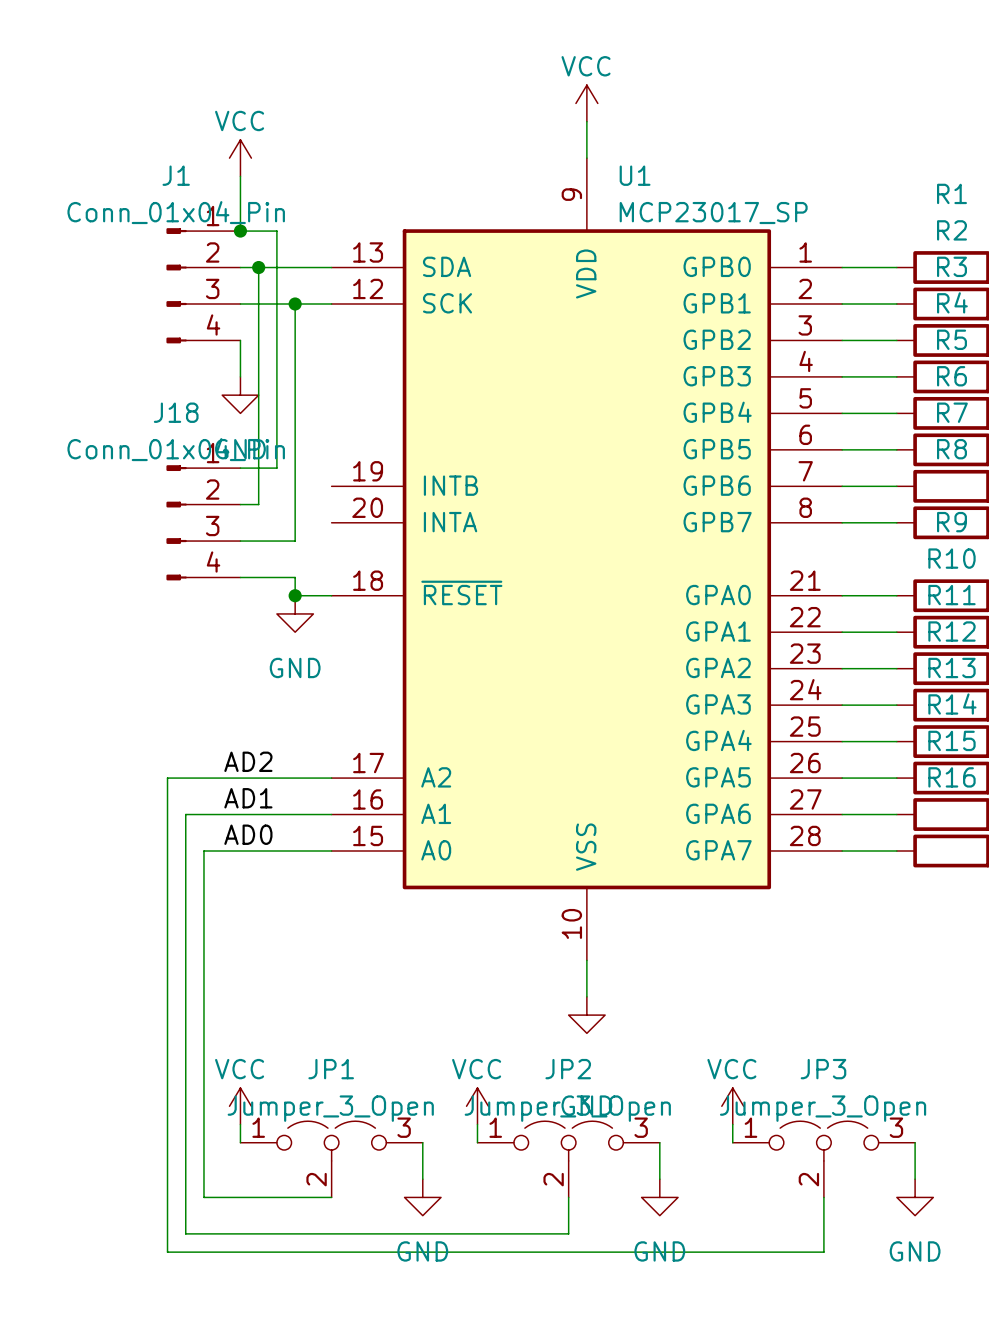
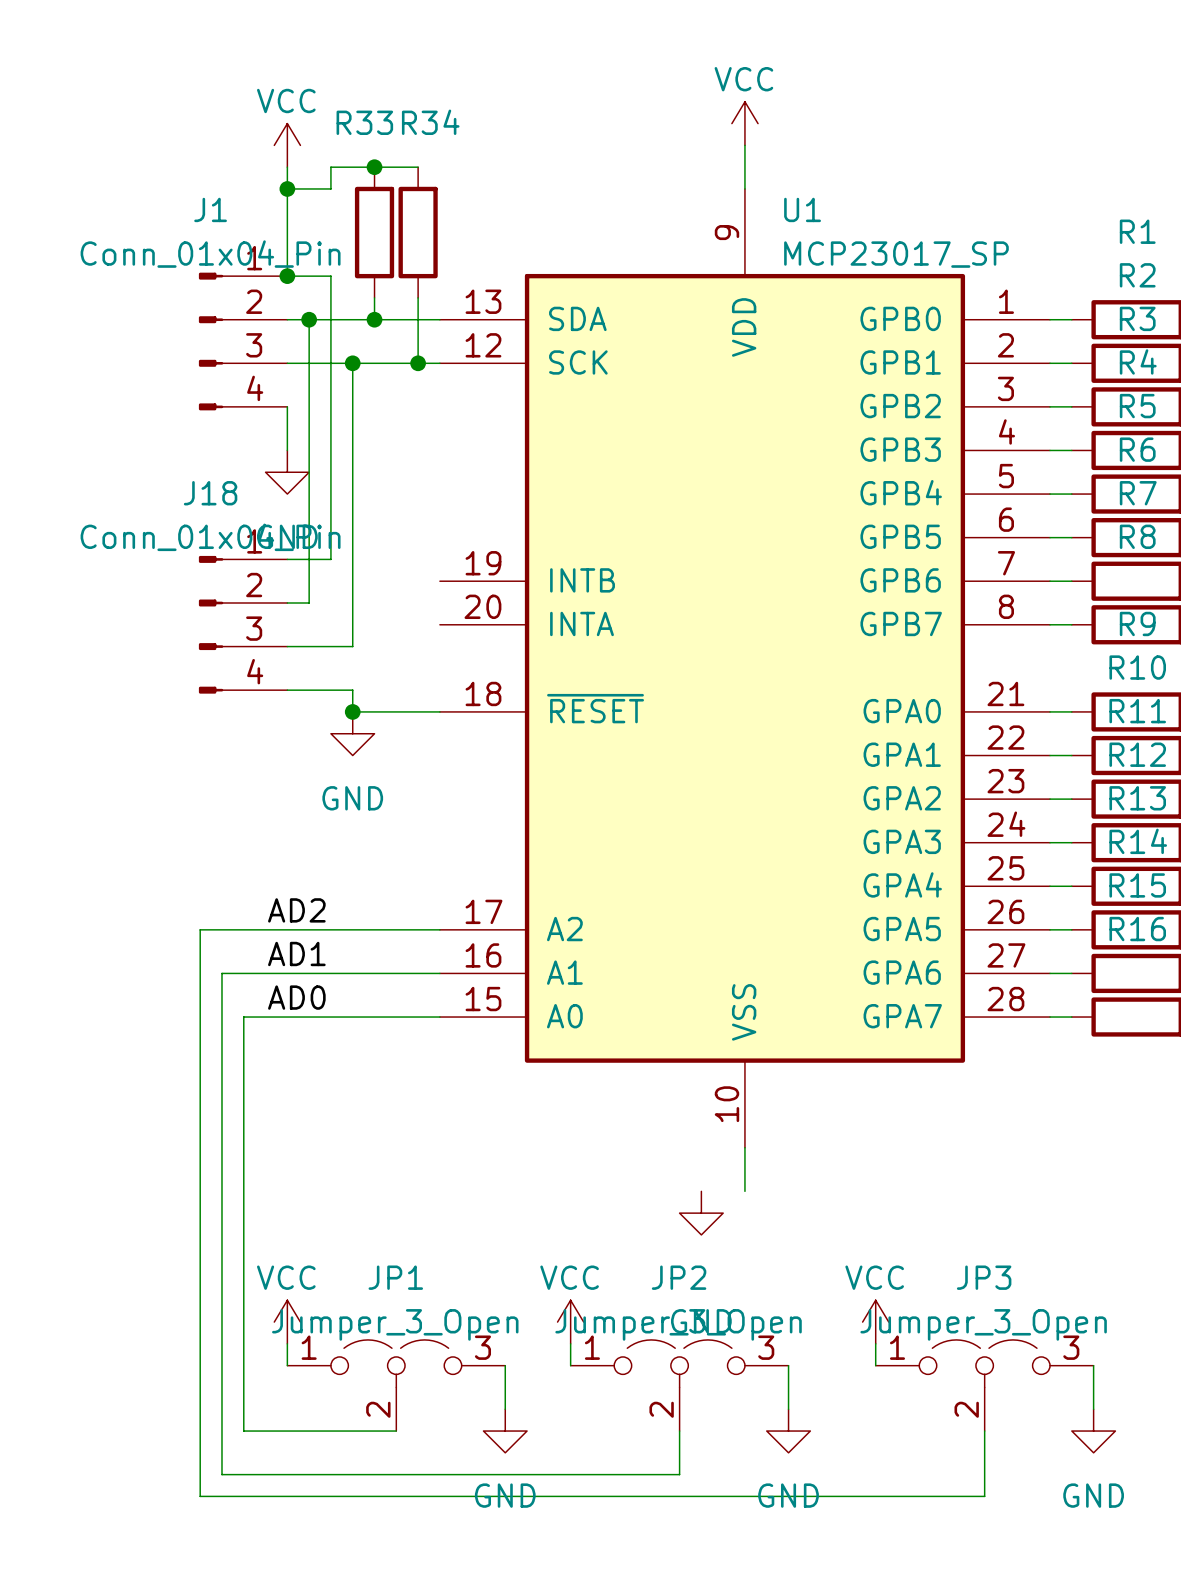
power symbol position: VCC (586, 103) -> VCC (744, 123)
wire: (586, 121) (586, 158) -> (744, 145) (744, 188)
junction: none -> (374, 167)
wire: none -> (418, 167) (330, 167) (330, 188) (287, 188)
power symbol position: VCC (240, 158) -> VCC (287, 145)
junction: none -> (287, 188)
R33: none -> (374, 232)
R34: none -> (418, 232)
wire: none -> (374, 297) (374, 319)
wire: none -> (418, 297) (418, 363)
junction: none -> (374, 319)
junction: none -> (418, 363)
U1 position: (586, 559) -> (744, 668)
wire: (586, 960) (586, 996) -> (744, 1147) (744, 1191)

